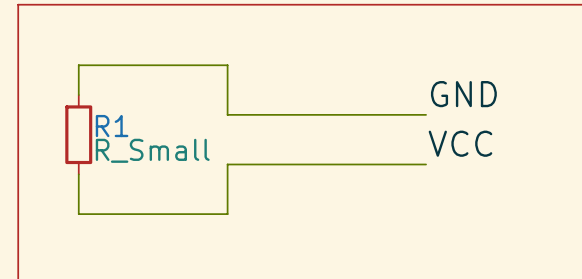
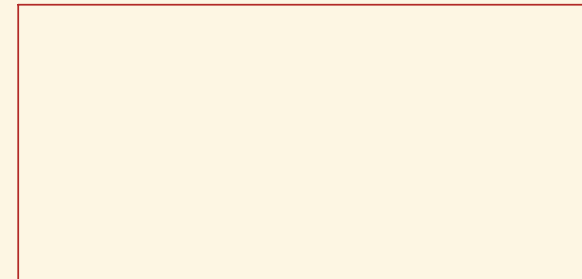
label: GND (463, 94) -> none
wire: (78, 95) (78, 65) (227, 65) (227, 114) (426, 114) -> none
R1: R_Small (78, 134) -> none
label: VCC (460, 143) -> none
wire: (426, 164) (227, 164) (227, 214) (78, 214) (78, 174) -> none

